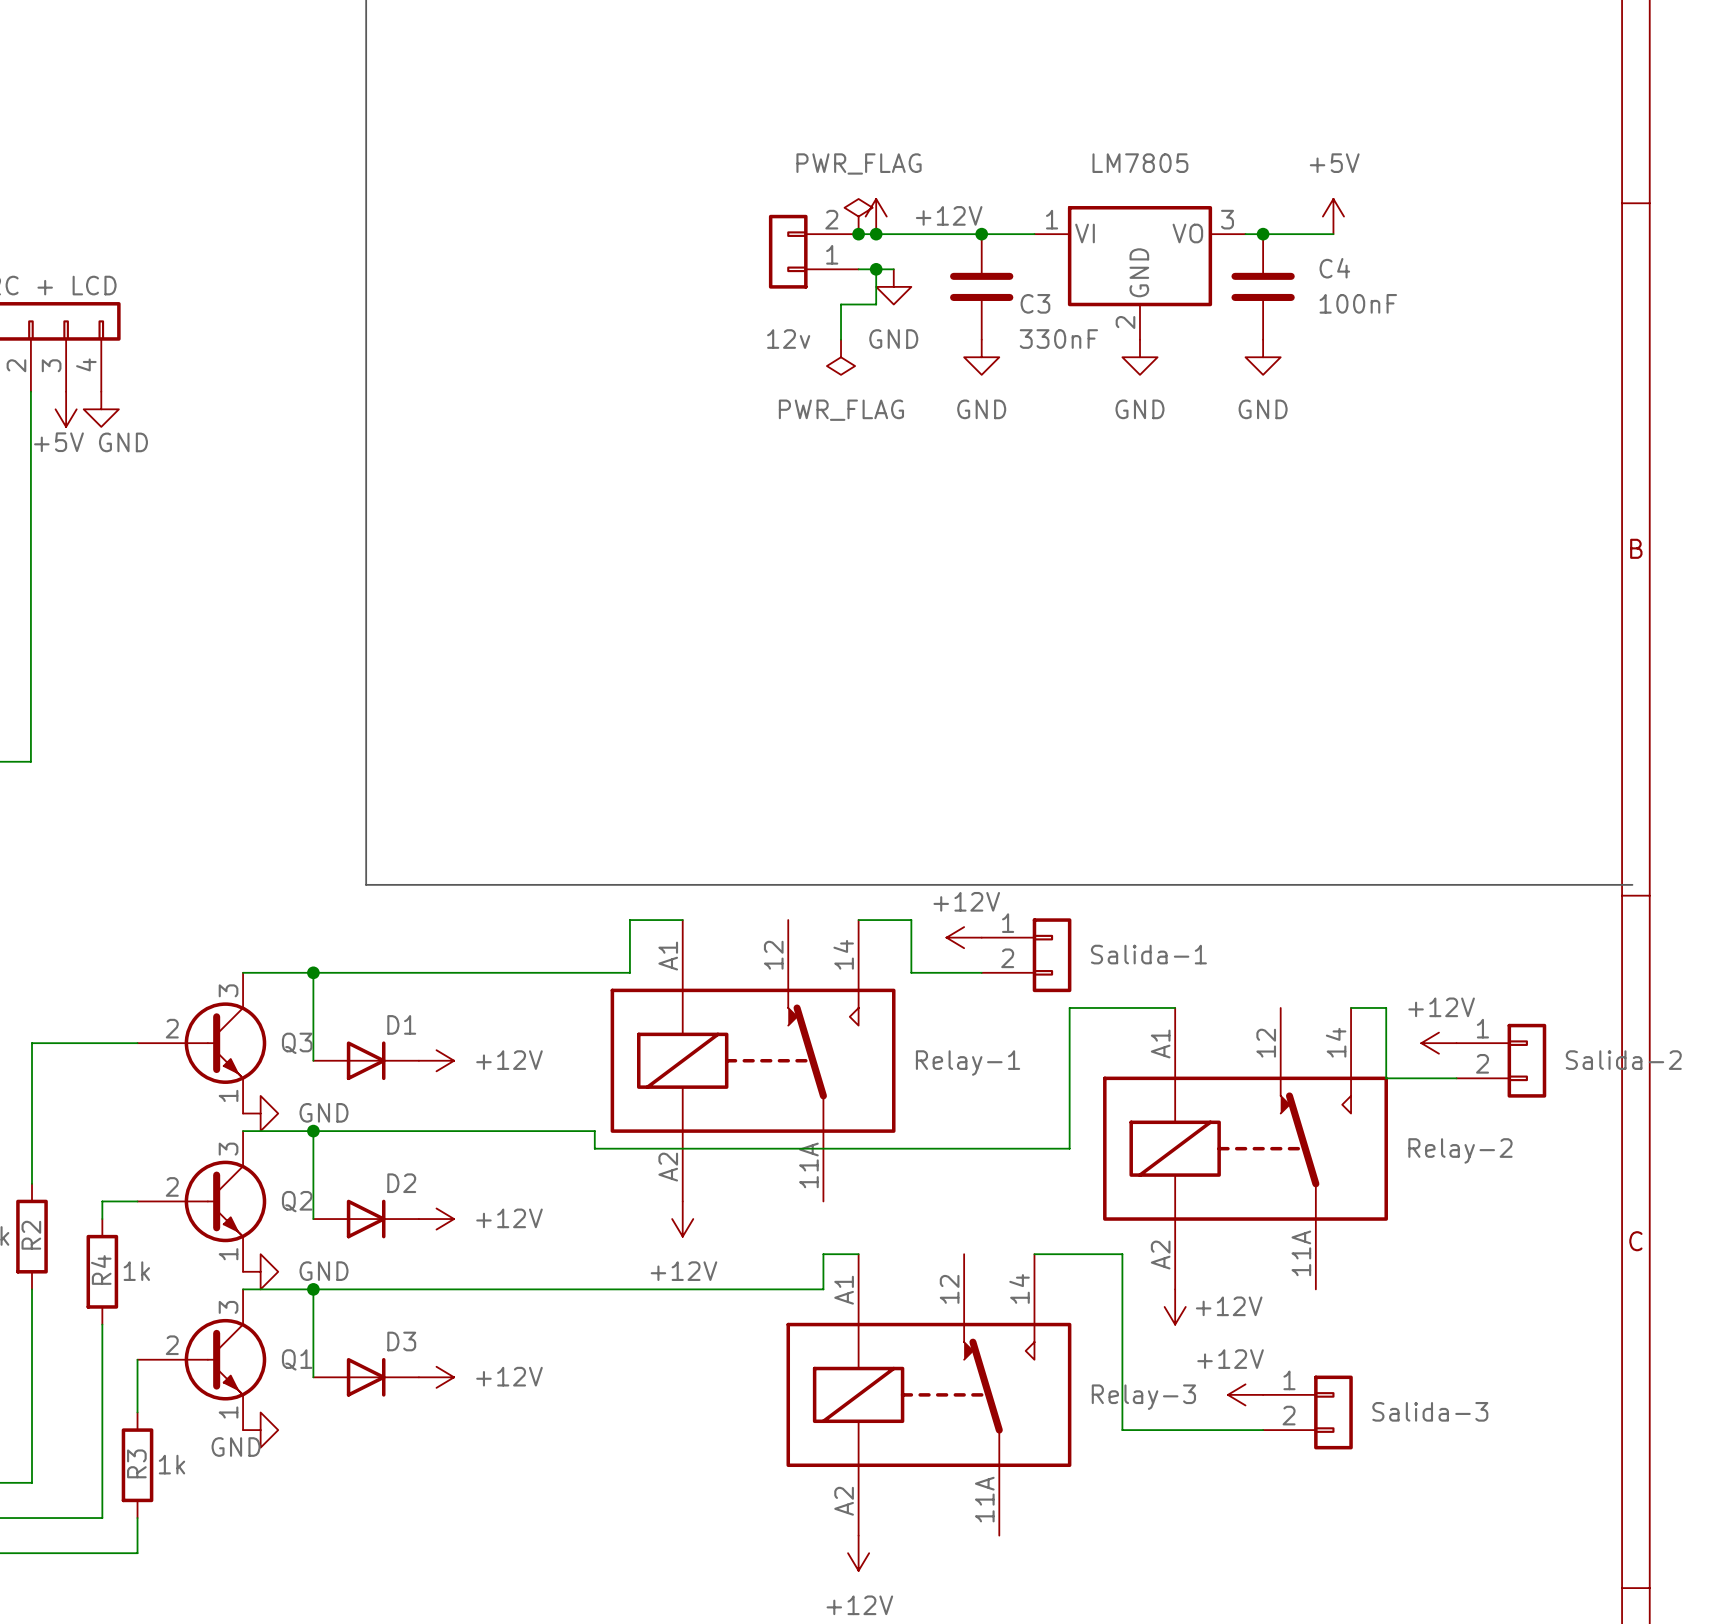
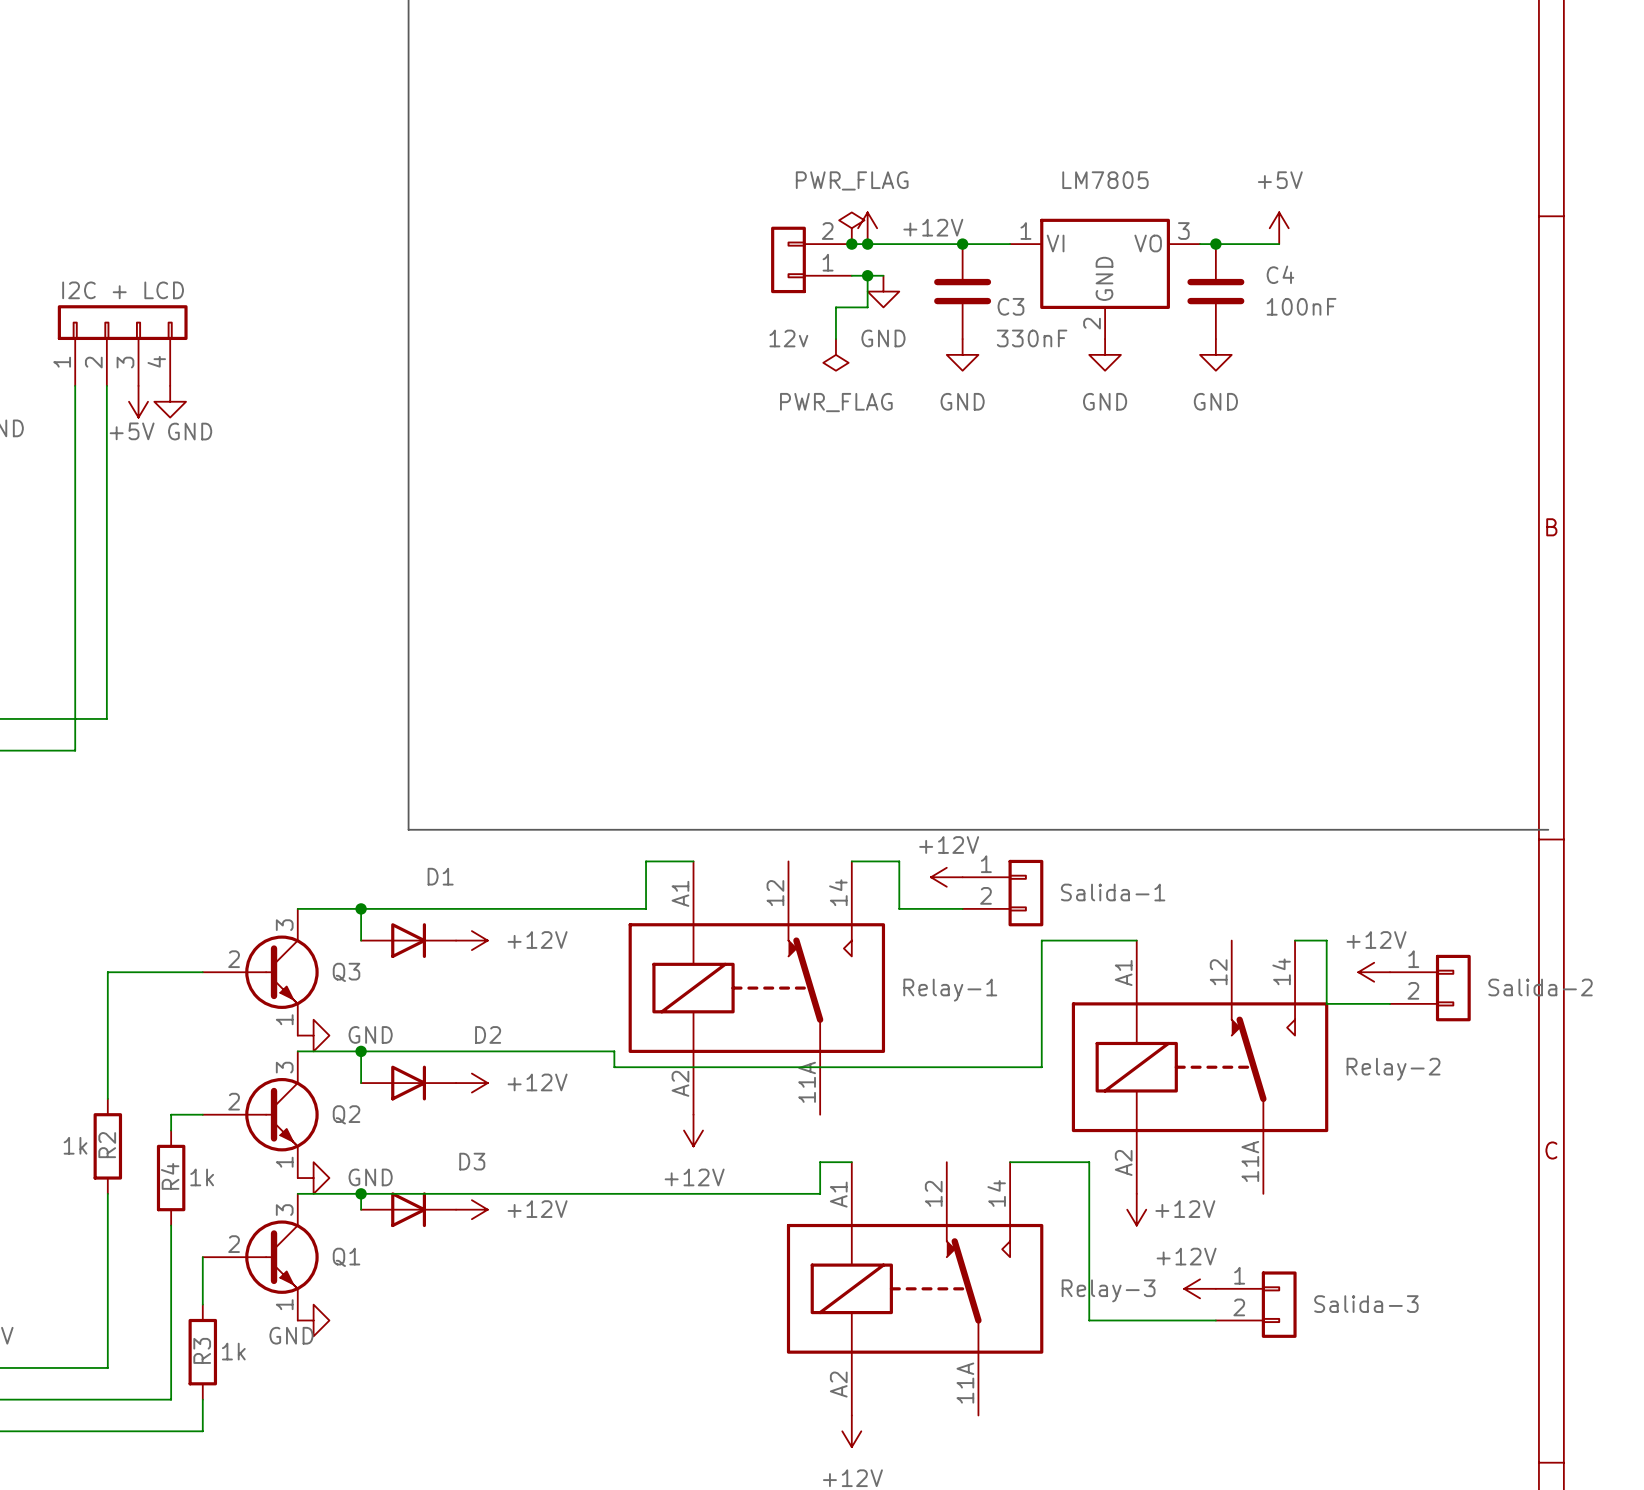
wire: (313, 1007) (313, 1060) -> none
power symbol: none -> +12V (471, 940)
D1 name position: D1 (401, 1024) -> D1 (440, 876)
D1 position: (366, 1060) -> (408, 940)
power symbol: +12V (436, 1060) -> none
wire: (313, 1166) (313, 1219) -> none
power symbol: none -> +12V (471, 1083)
D2 name position: D2 (401, 1183) -> D2 (488, 1034)
D2 position: (366, 1219) -> (408, 1083)
power symbol: +12V (436, 1219) -> none
wire: (313, 1306) (313, 1377) -> none
power symbol: none -> +12V (471, 1209)
D3 name position: D3 (401, 1341) -> D3 (472, 1161)
D3 position: (366, 1377) -> (408, 1209)
power symbol: +12V (436, 1377) -> none

